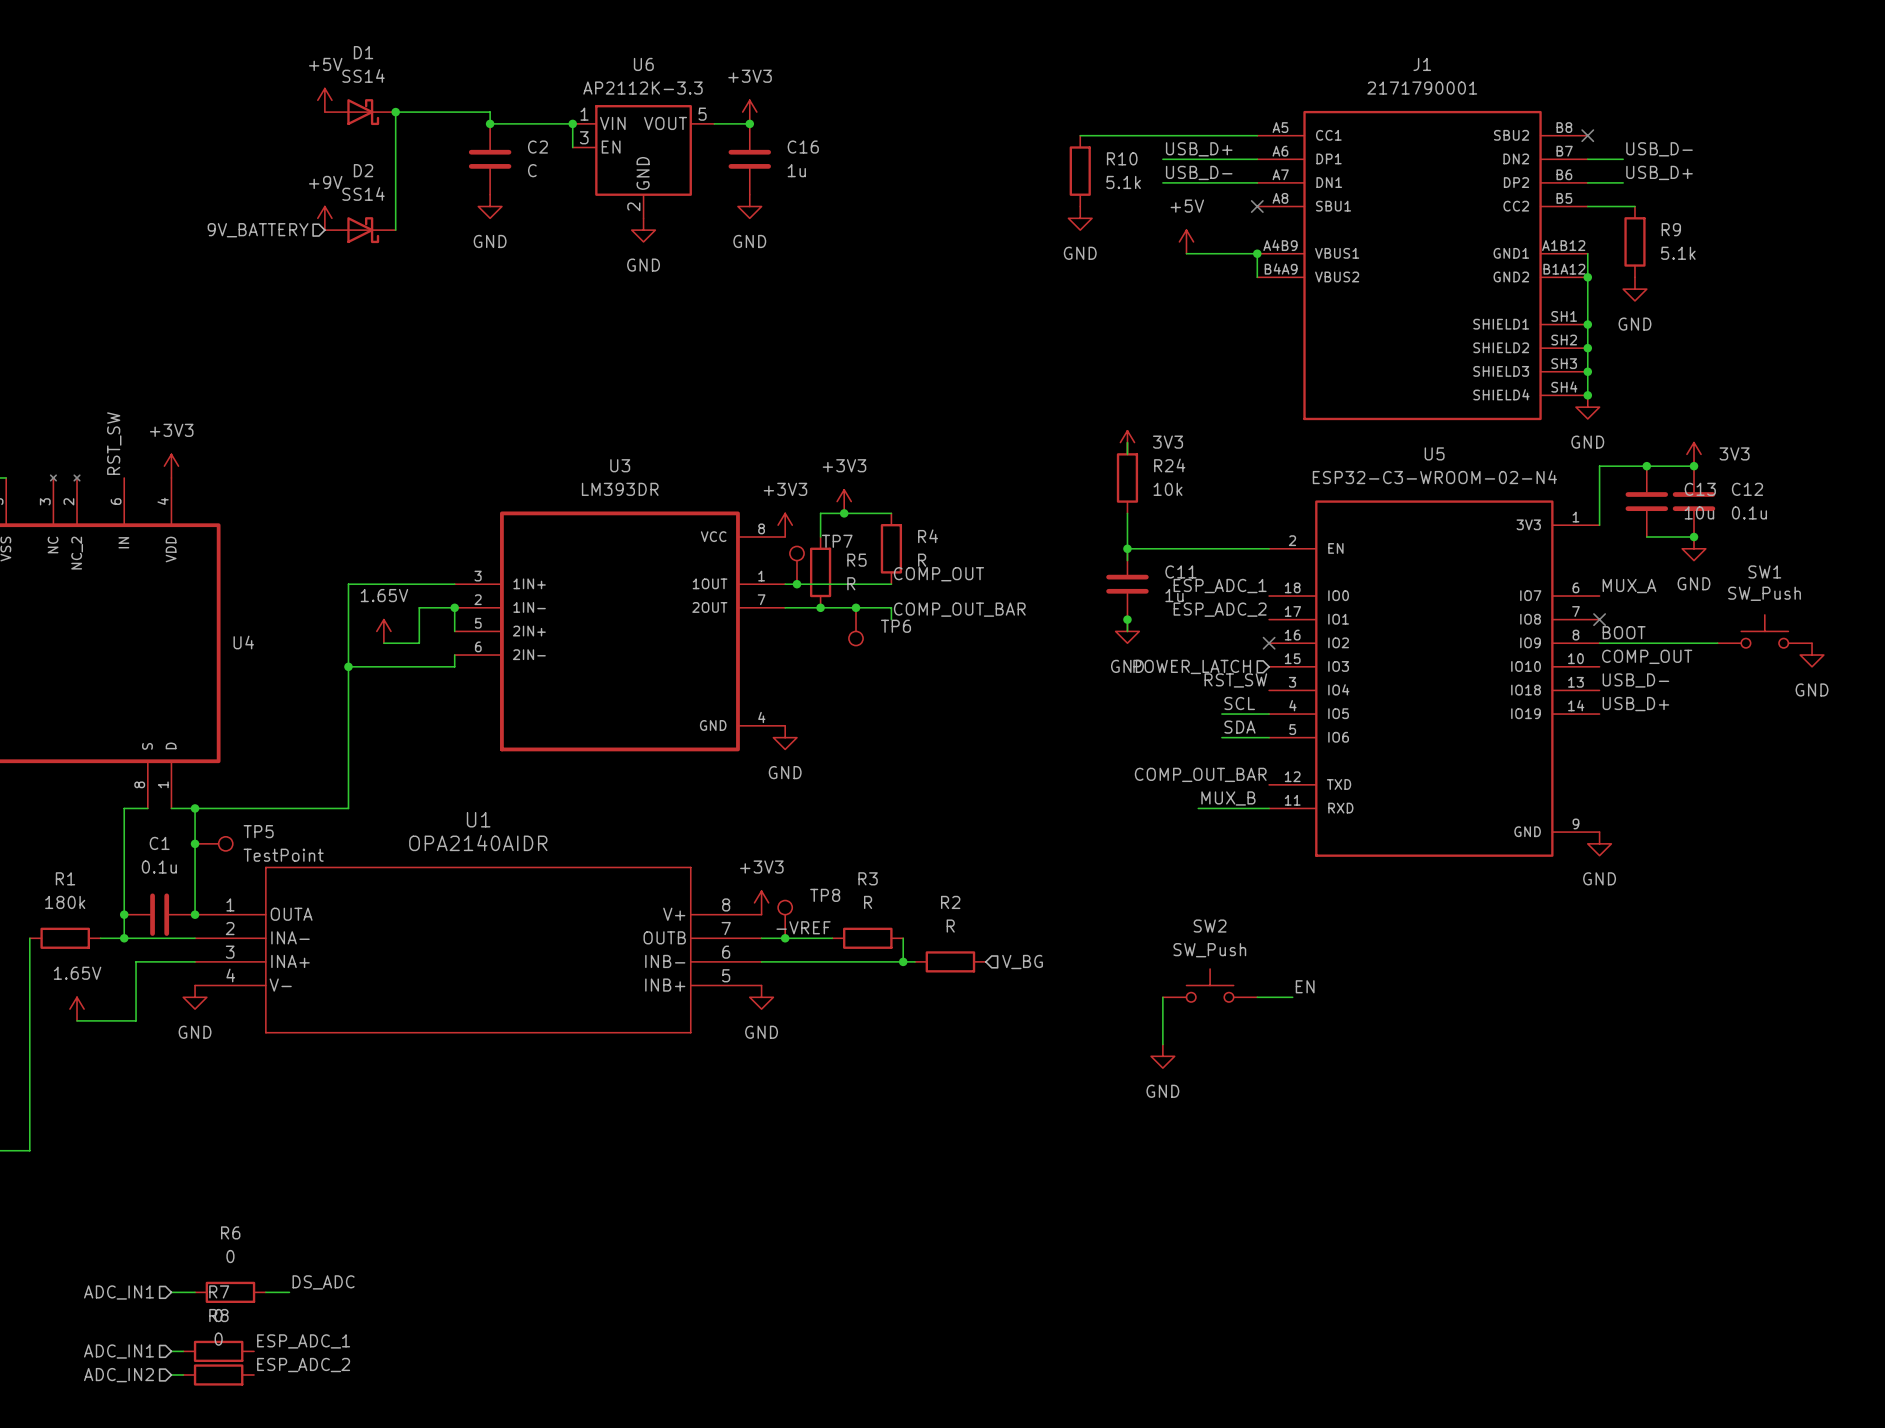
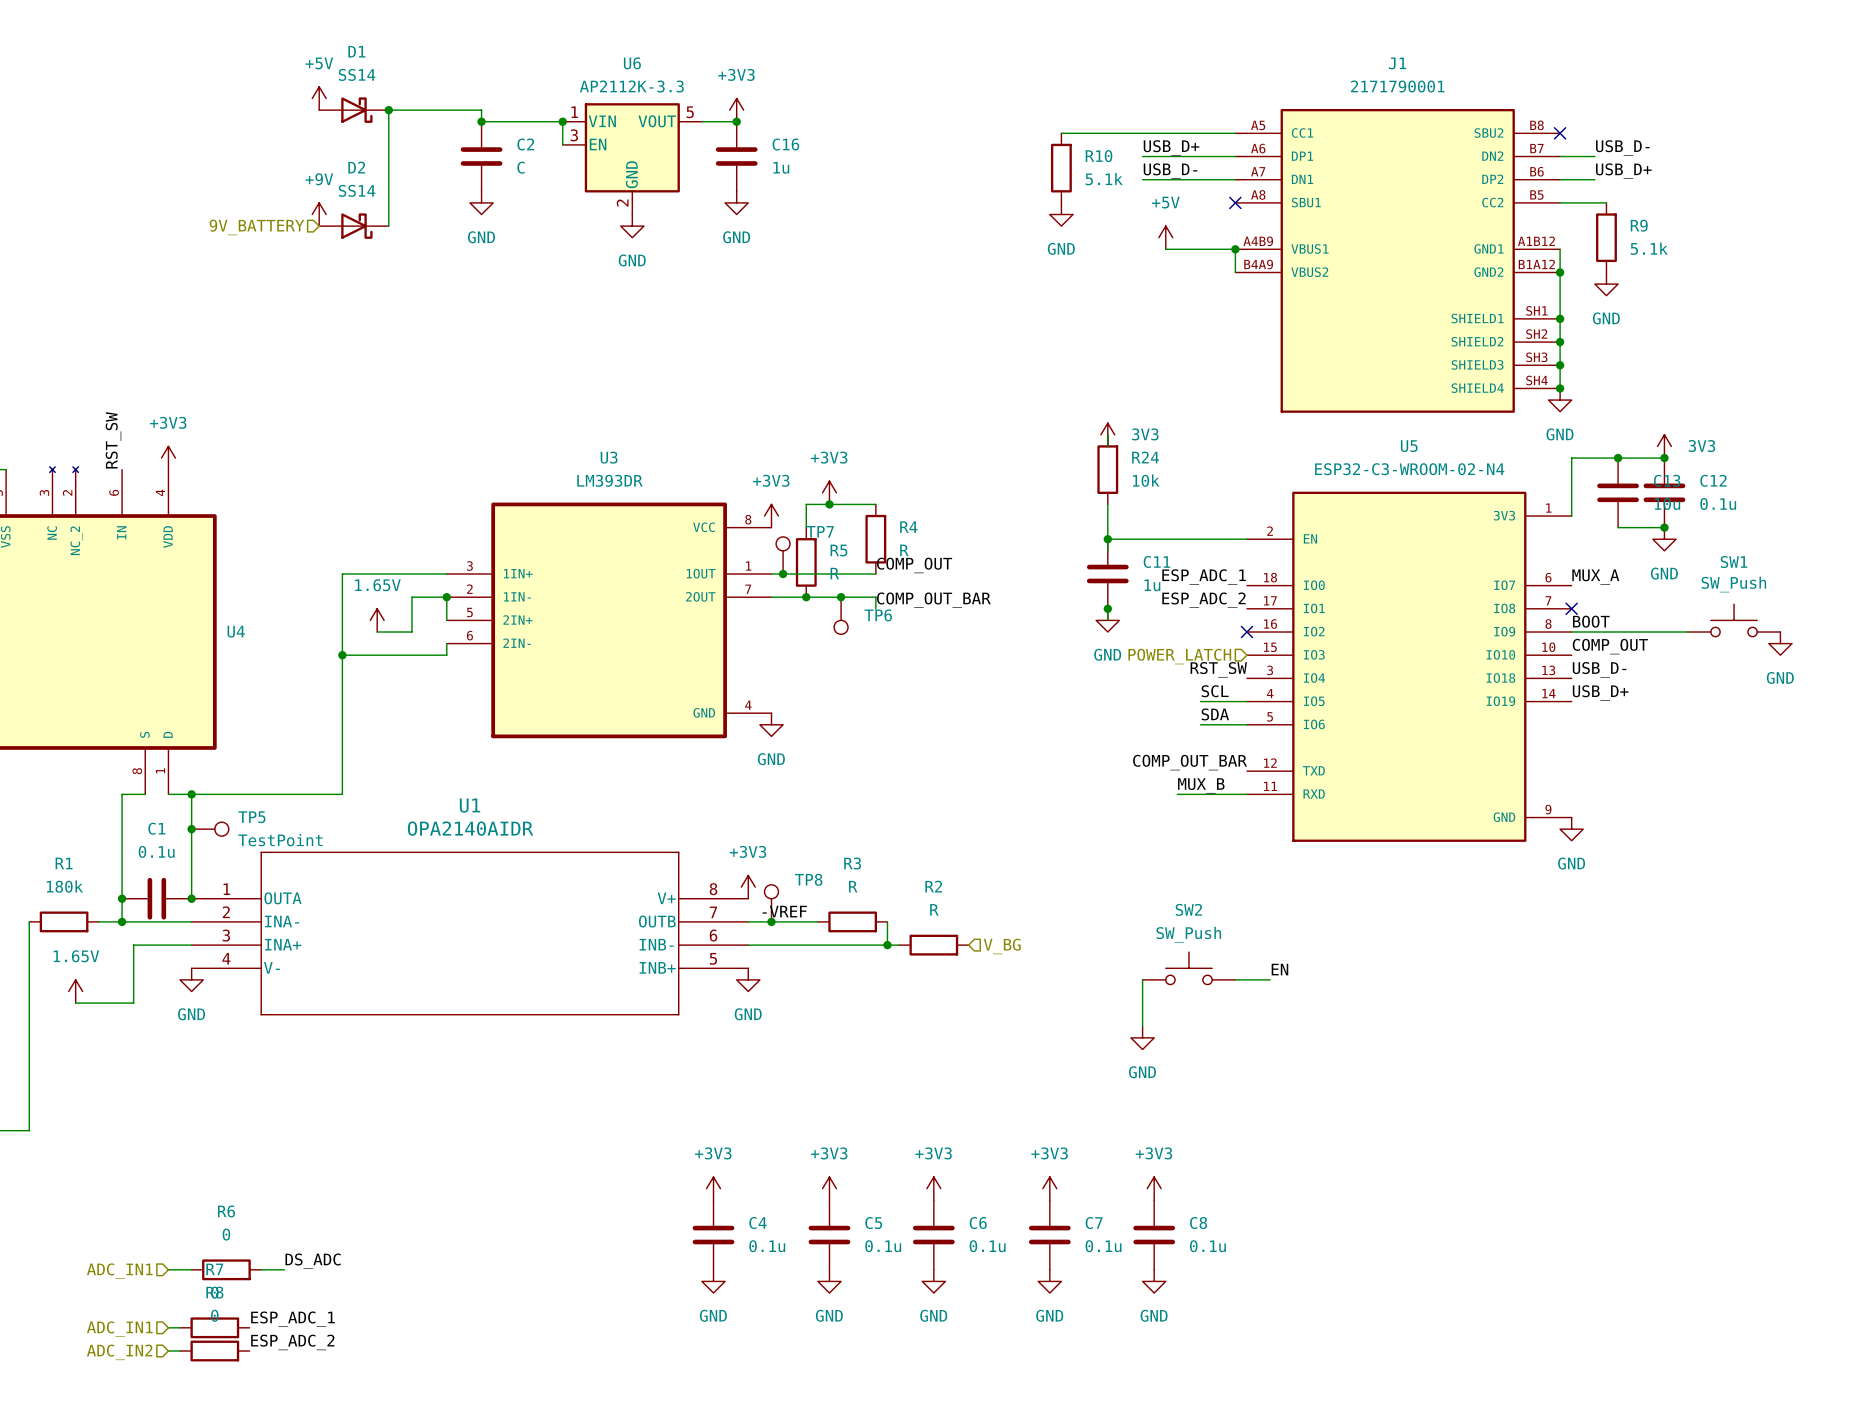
power symbol: none -> +3V3 (713, 1188)
power symbol: none -> +3V3 (829, 1188)
power symbol: none -> +3V3 (933, 1188)
power symbol: none -> +3V3 (1049, 1188)
power symbol: none -> +3V3 (1154, 1188)
C4: none -> 0.1u (713, 1235)
C5: none -> 0.1u (829, 1235)
C6: none -> 0.1u (933, 1235)
C7: none -> 0.1u (1049, 1235)
C8: none -> 0.1u (1154, 1235)
power symbol: none -> GND (713, 1281)
power symbol: none -> GND (829, 1281)
power symbol: none -> GND (933, 1281)
power symbol: none -> GND (1049, 1281)
power symbol: none -> GND (1154, 1281)

